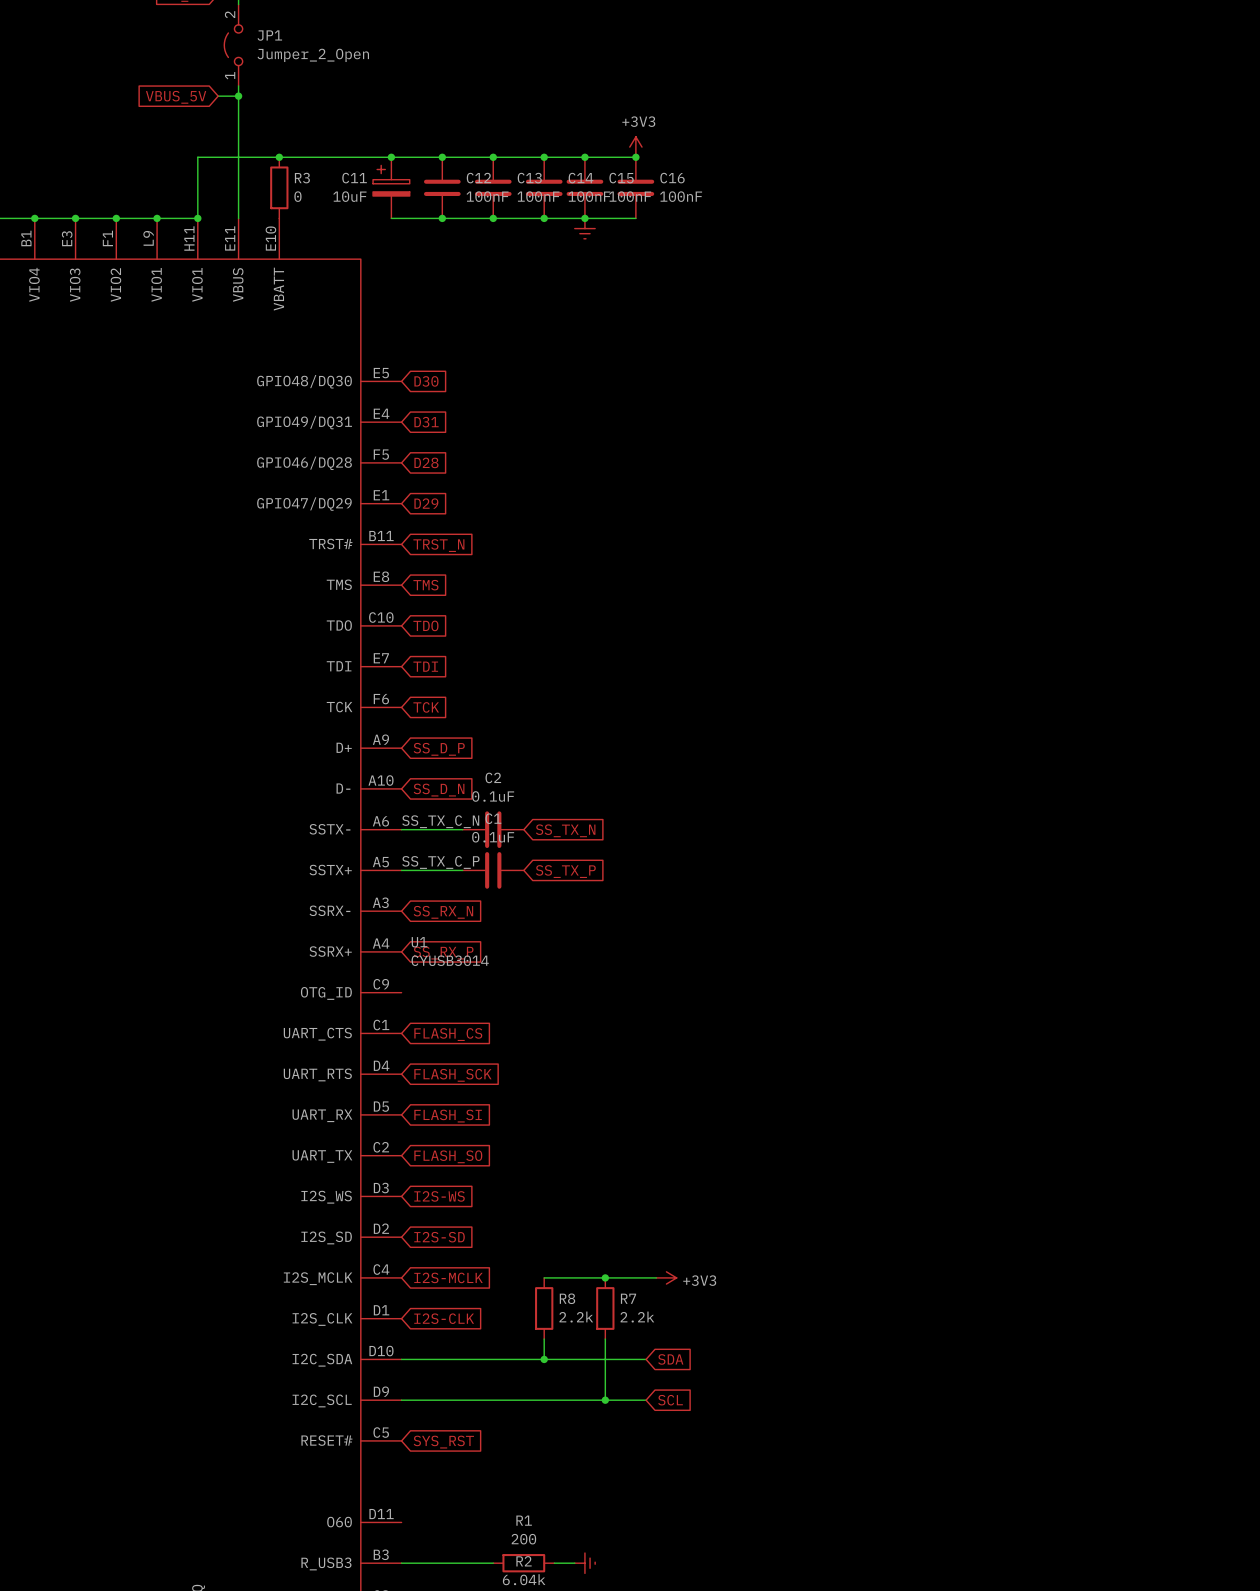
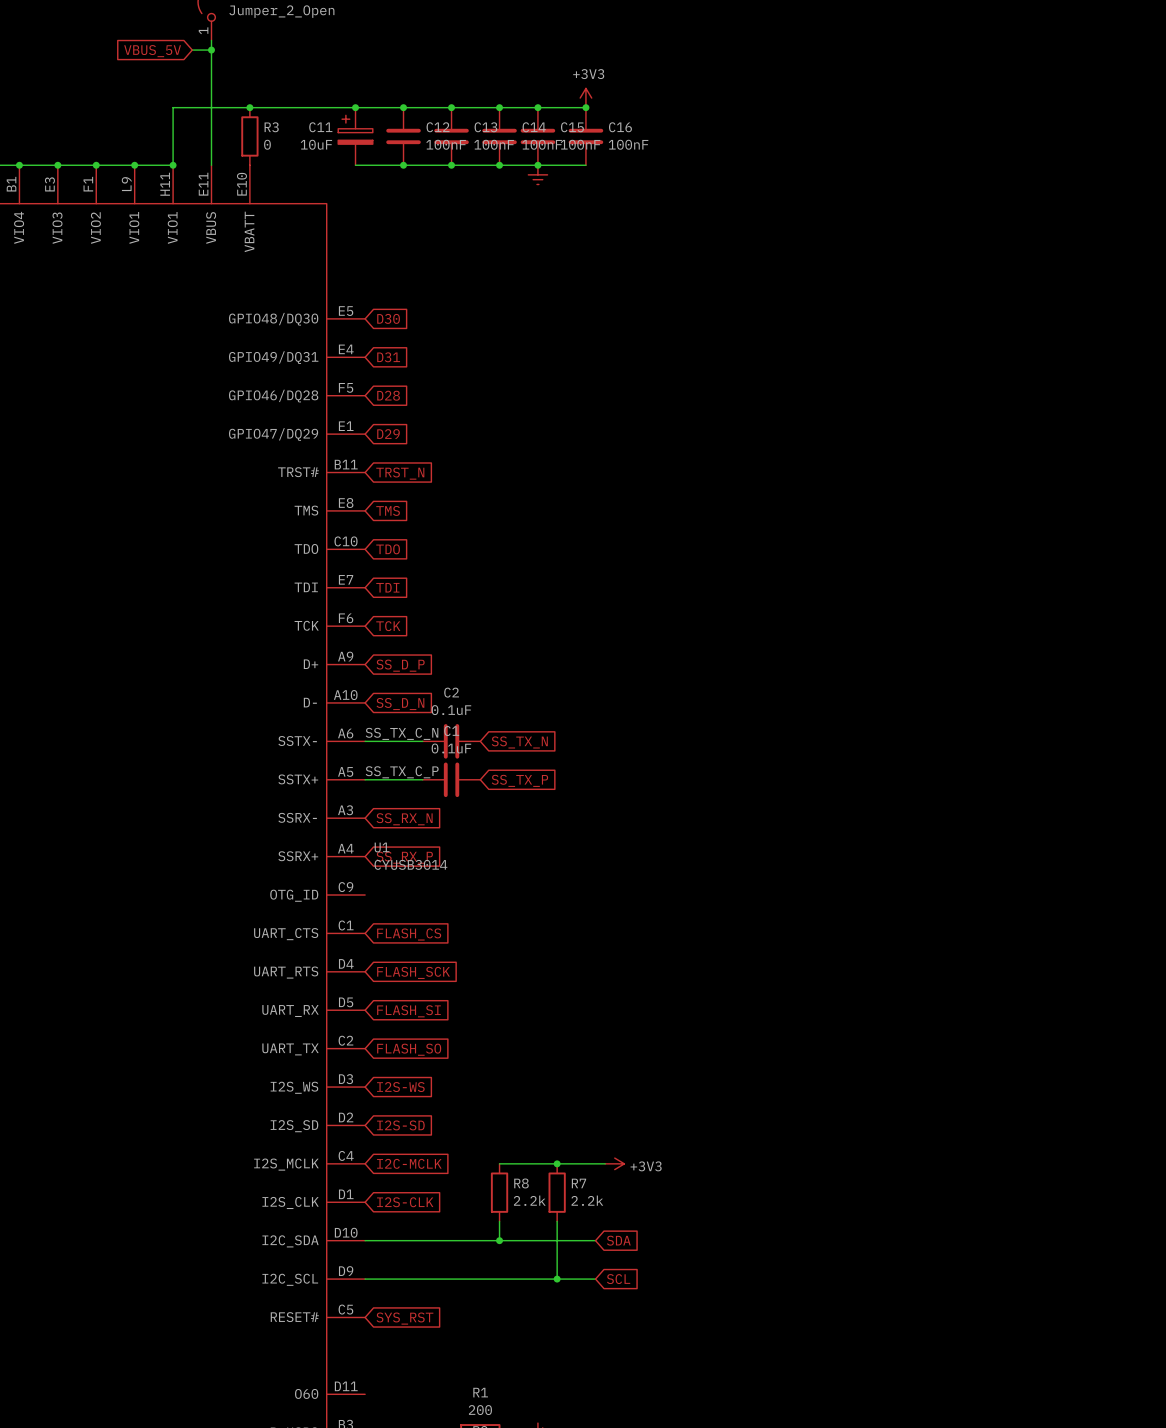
global label: I2S-MCLK (448, 1277) -> I2C-MCLK (409, 1163)

